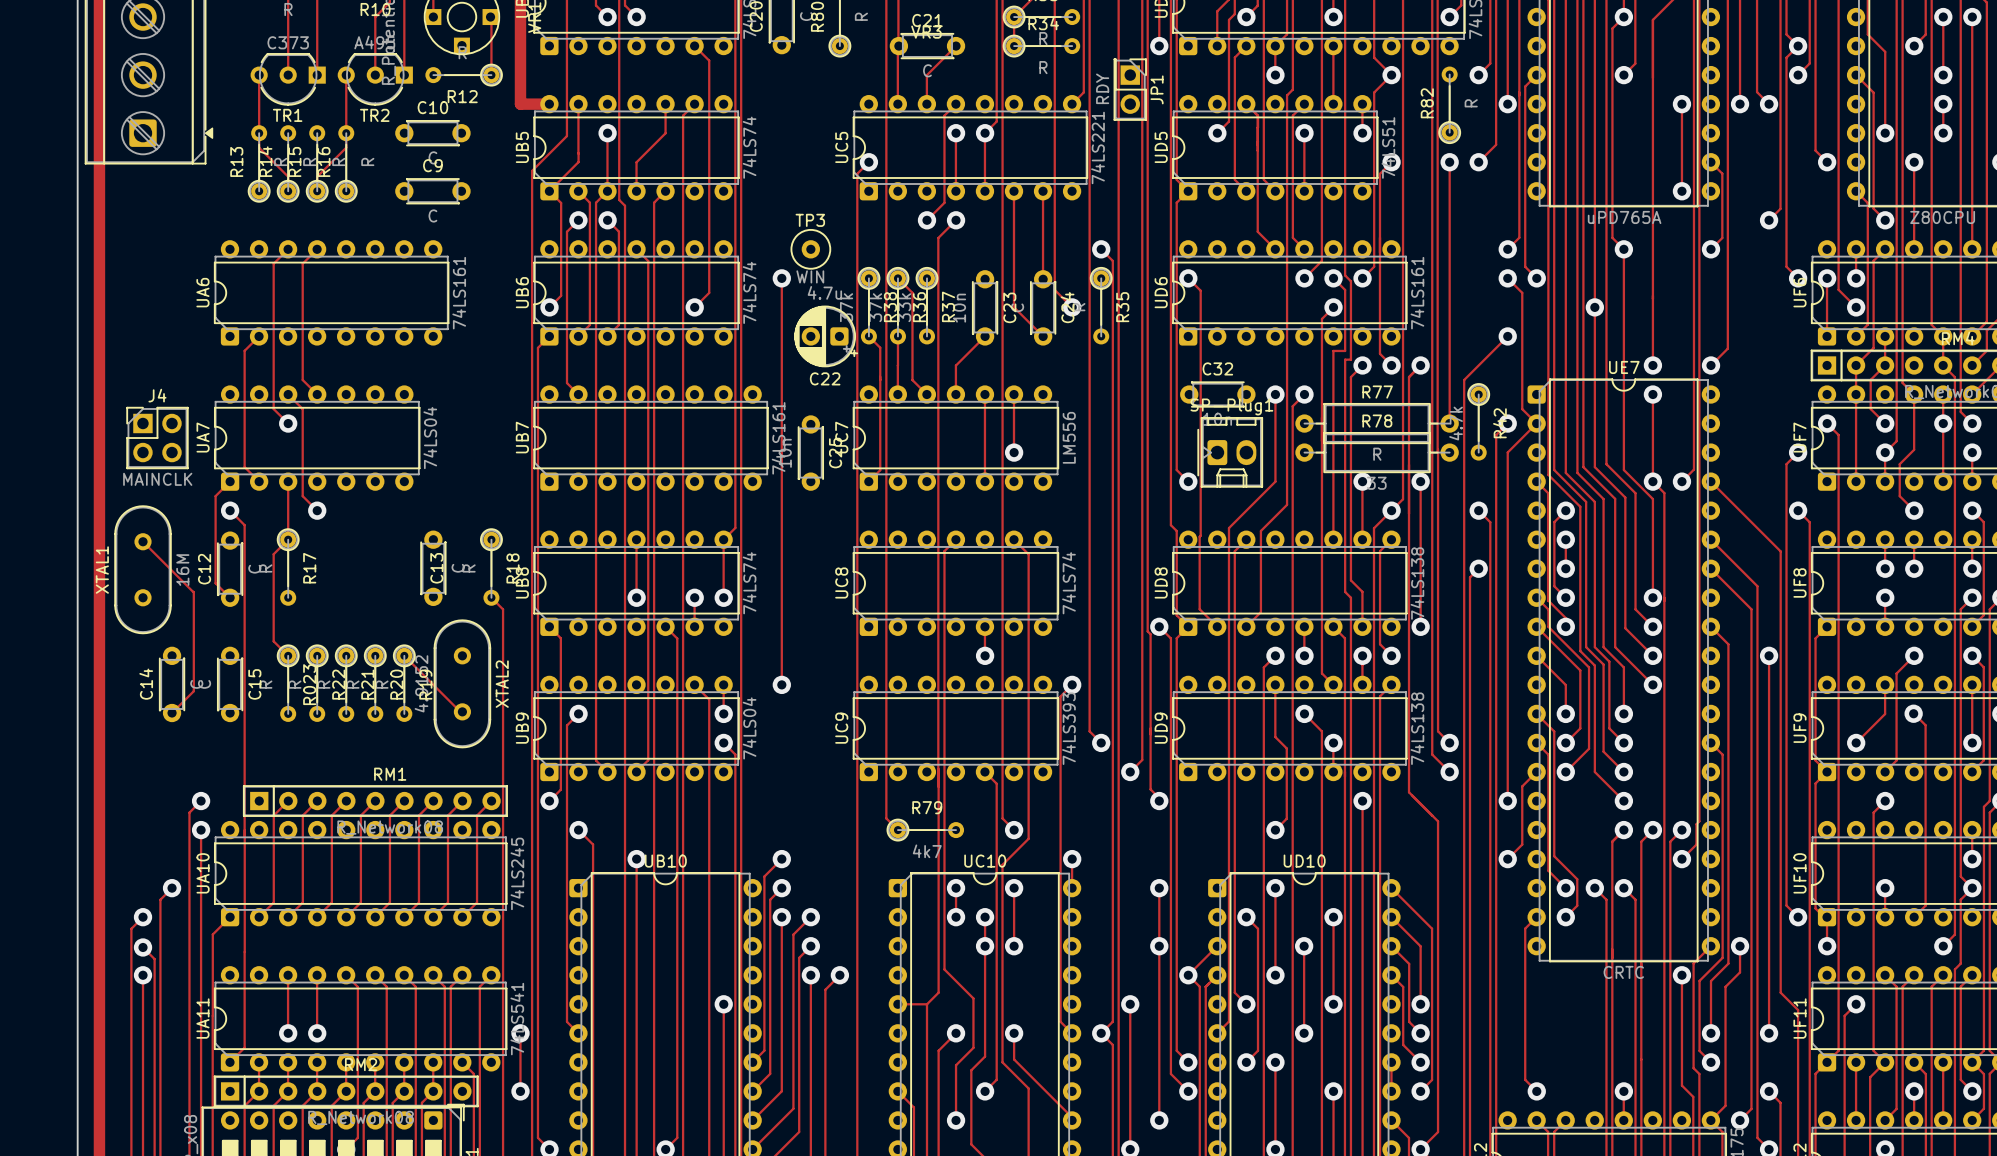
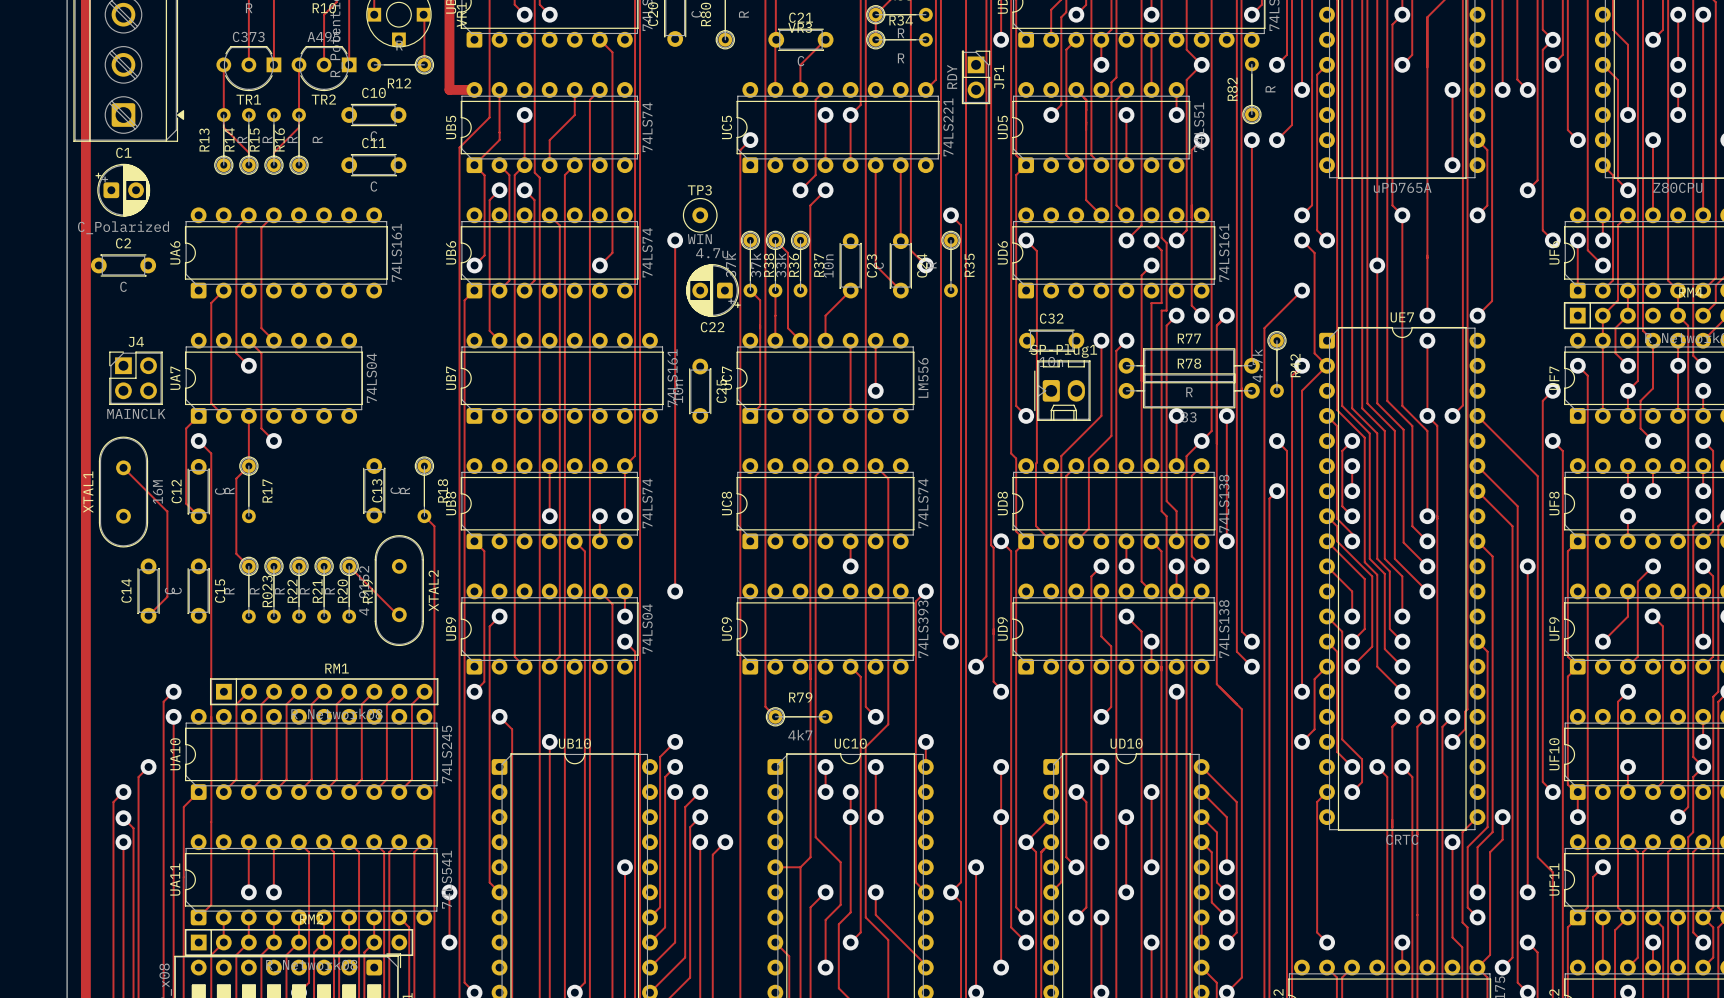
C9 name: C9 (432, 165) -> C11 (374, 143)
C1: none -> C_Polarized (122, 190)
C2: none -> C (123, 265)

